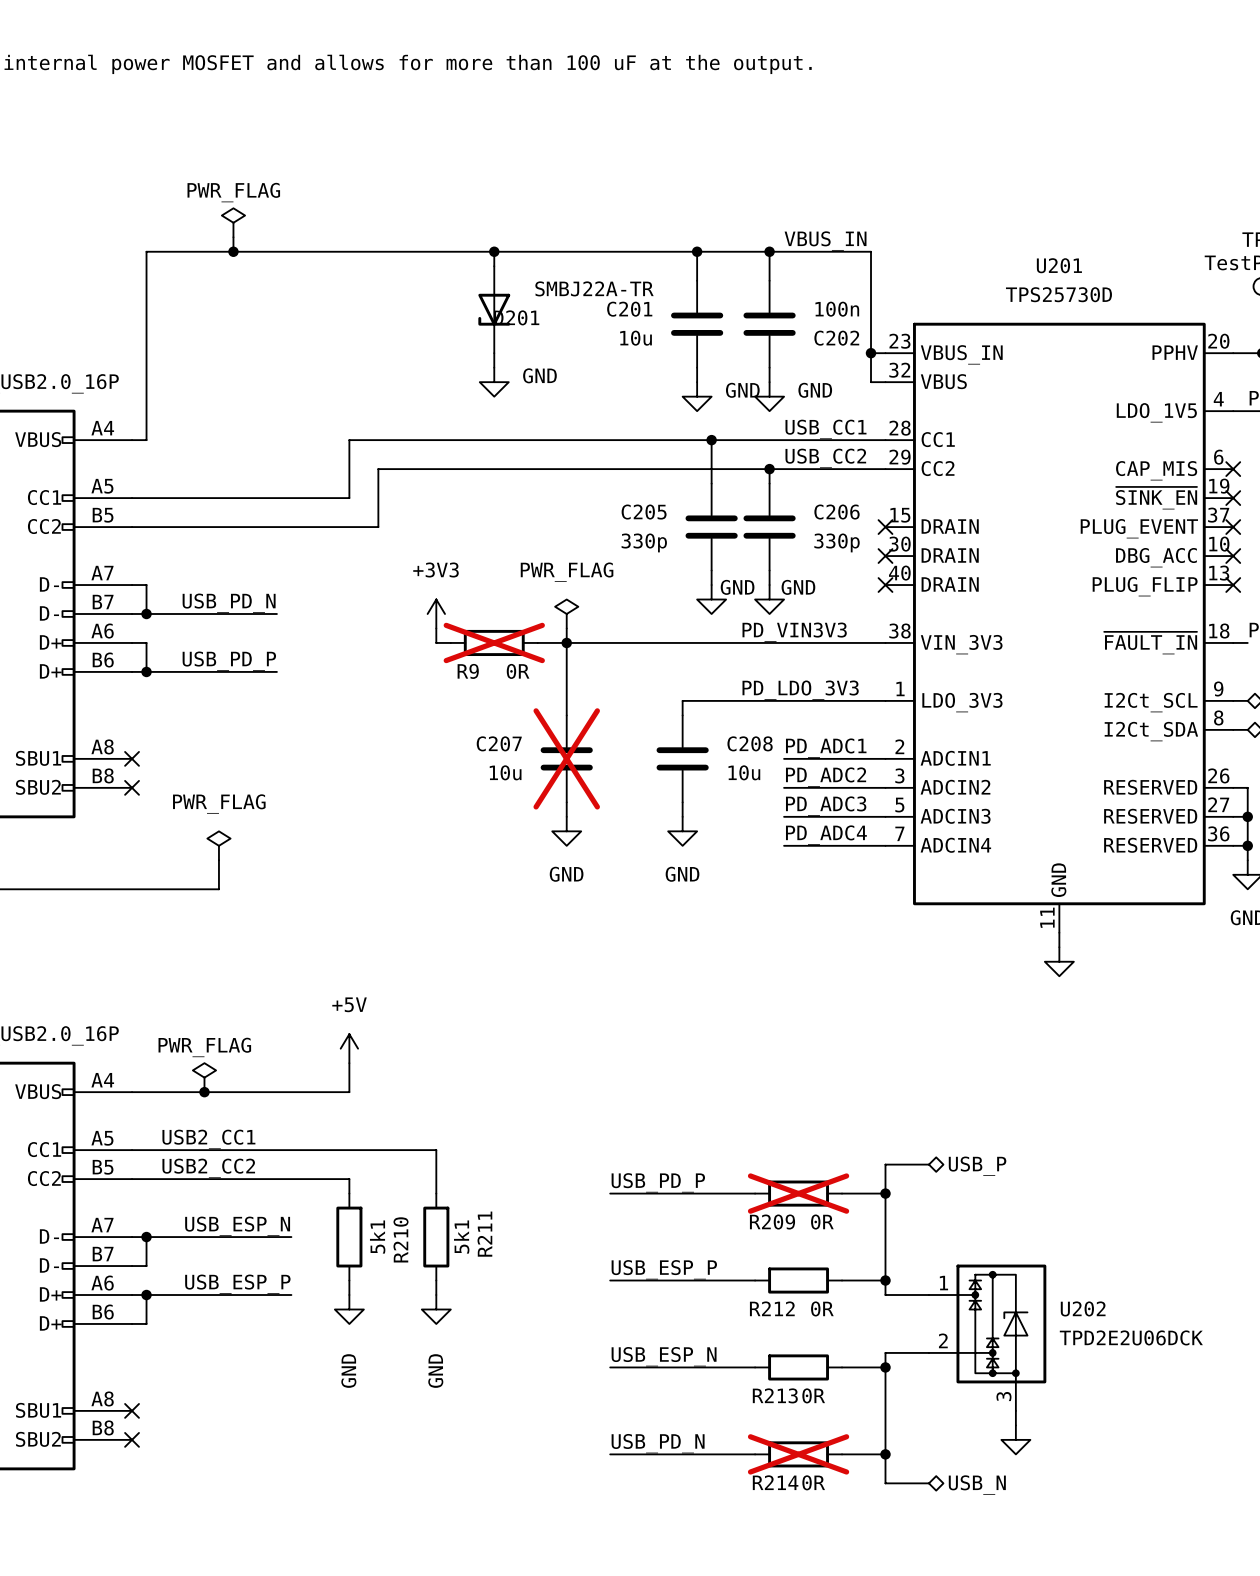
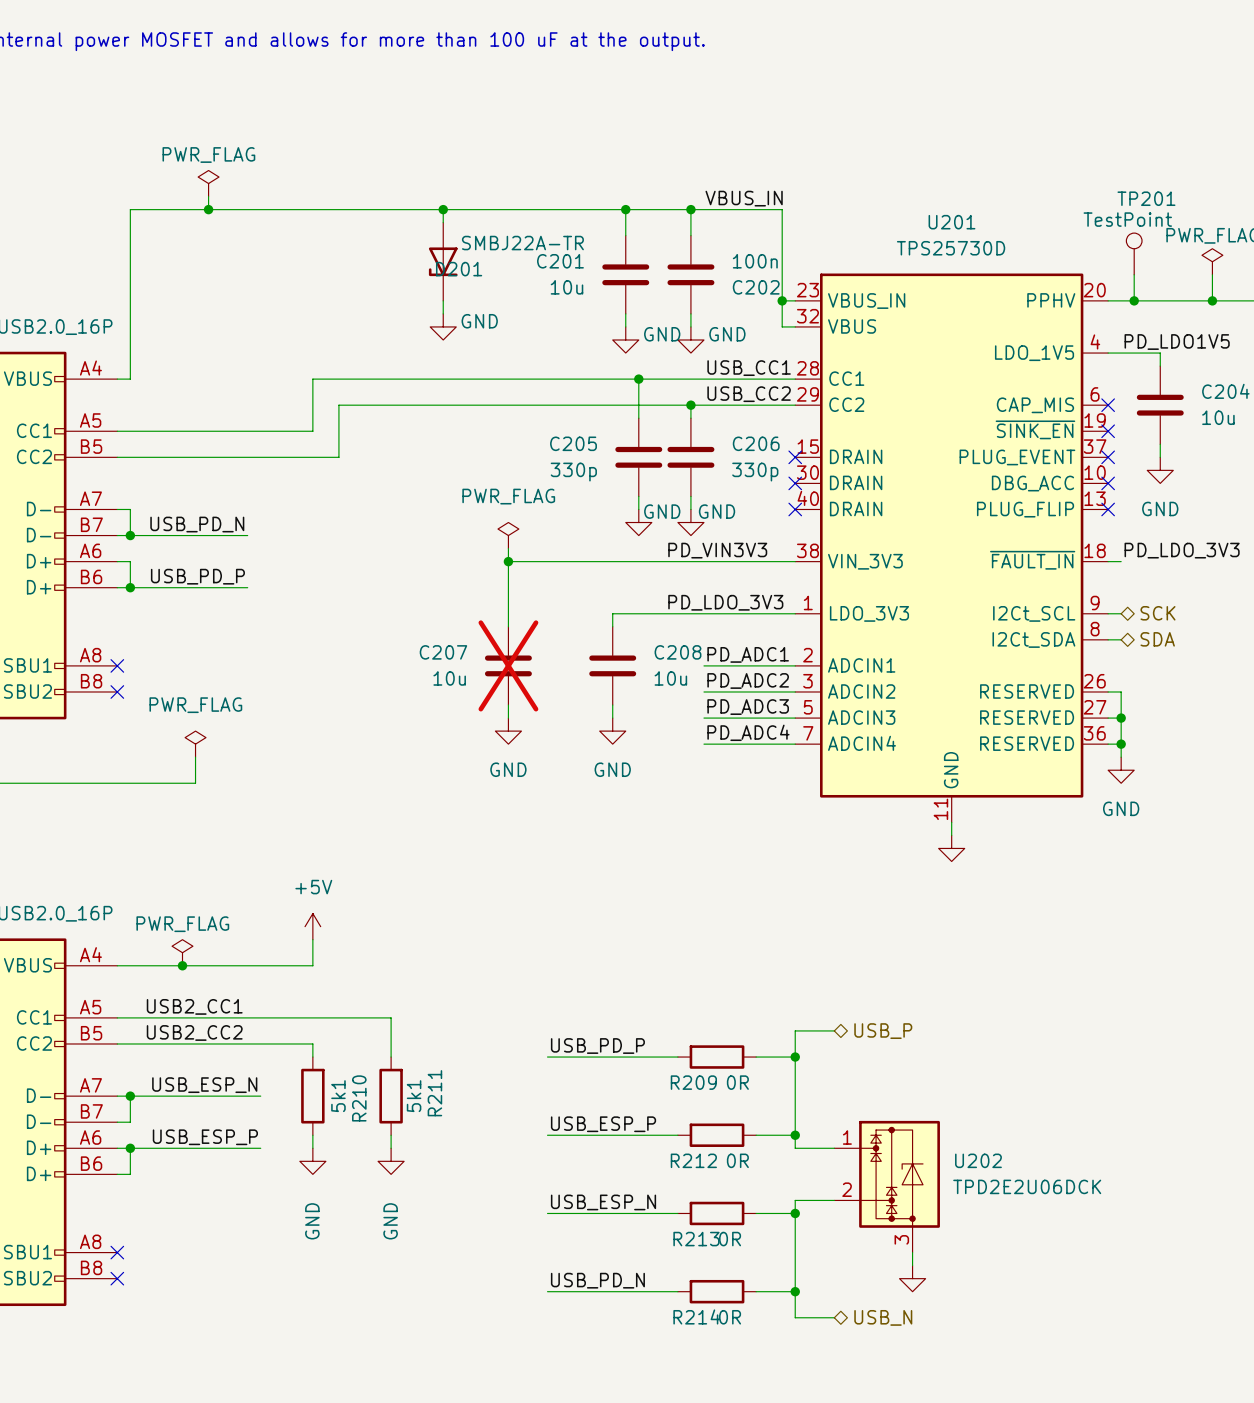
power symbol: +3V3 (436, 613) -> none
wire: (436, 628) (436, 642) (450, 642) -> none
R9: 0R (494, 642) -> none
wire: (537, 642) (566, 642) -> none
R209 do-not-place cross: (798, 1193) -> none
R214 do-not-place cross: (798, 1454) -> none

